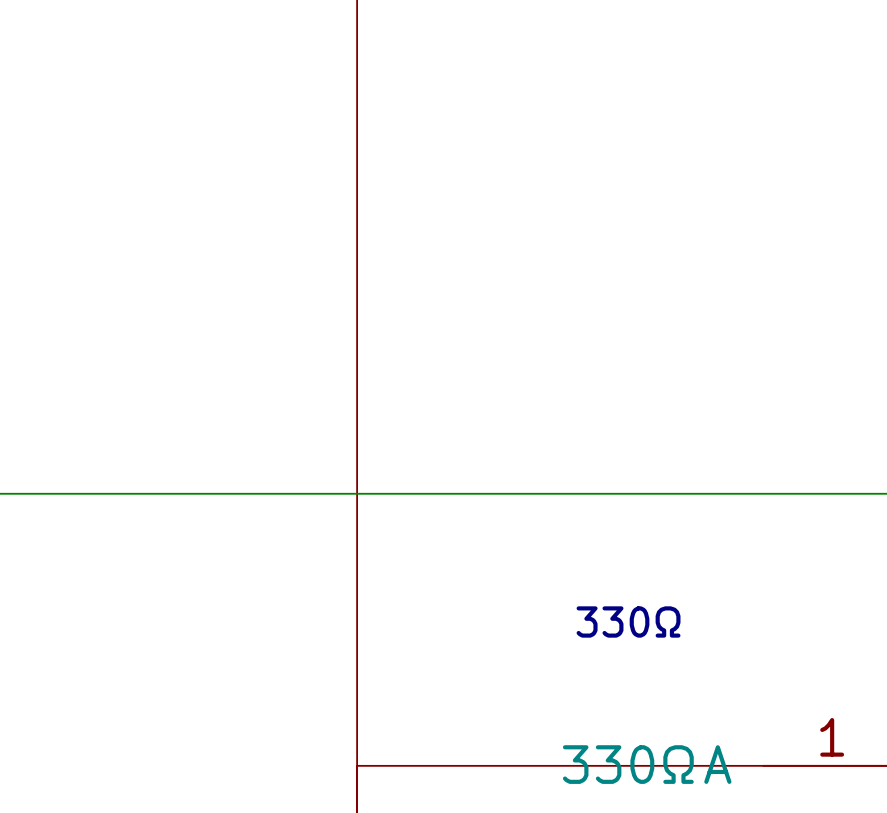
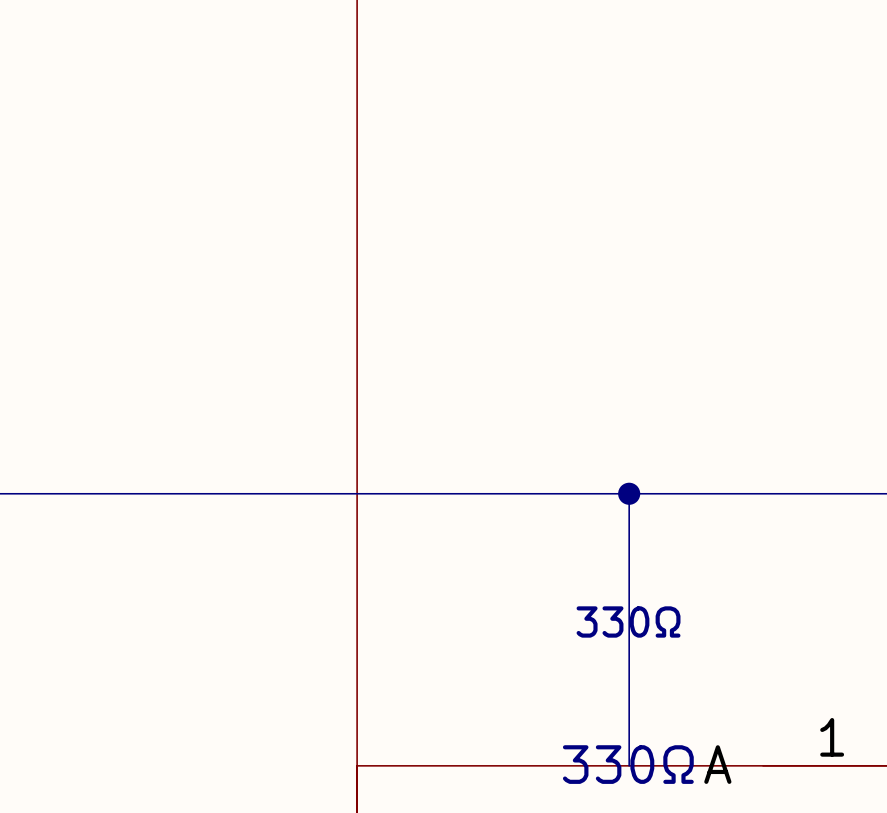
wire: none -> (629, 493) (629, 765)
junction: none -> (629, 493)

